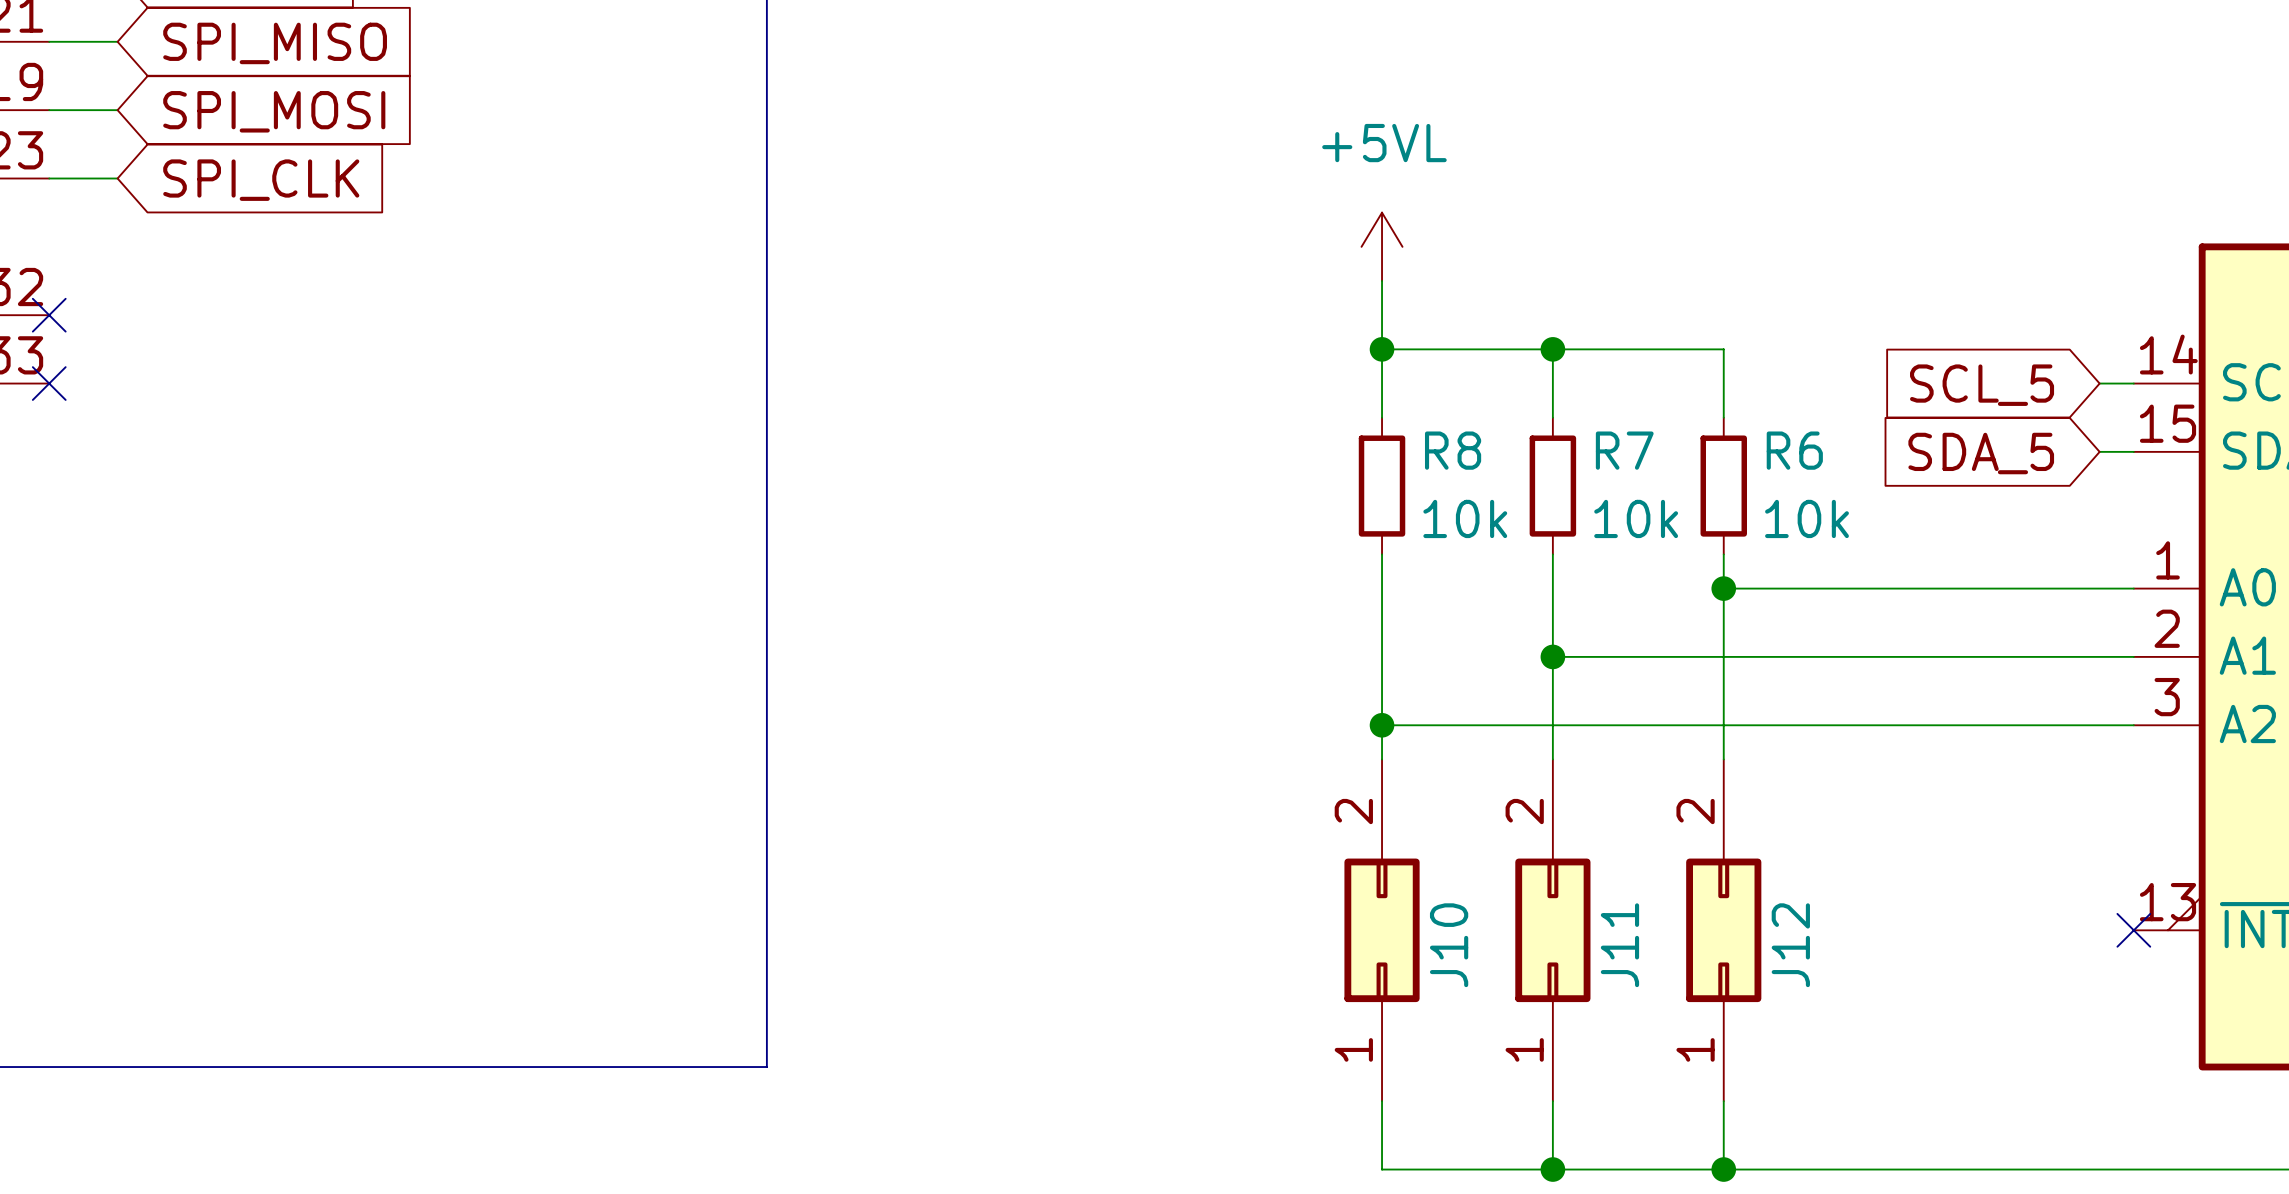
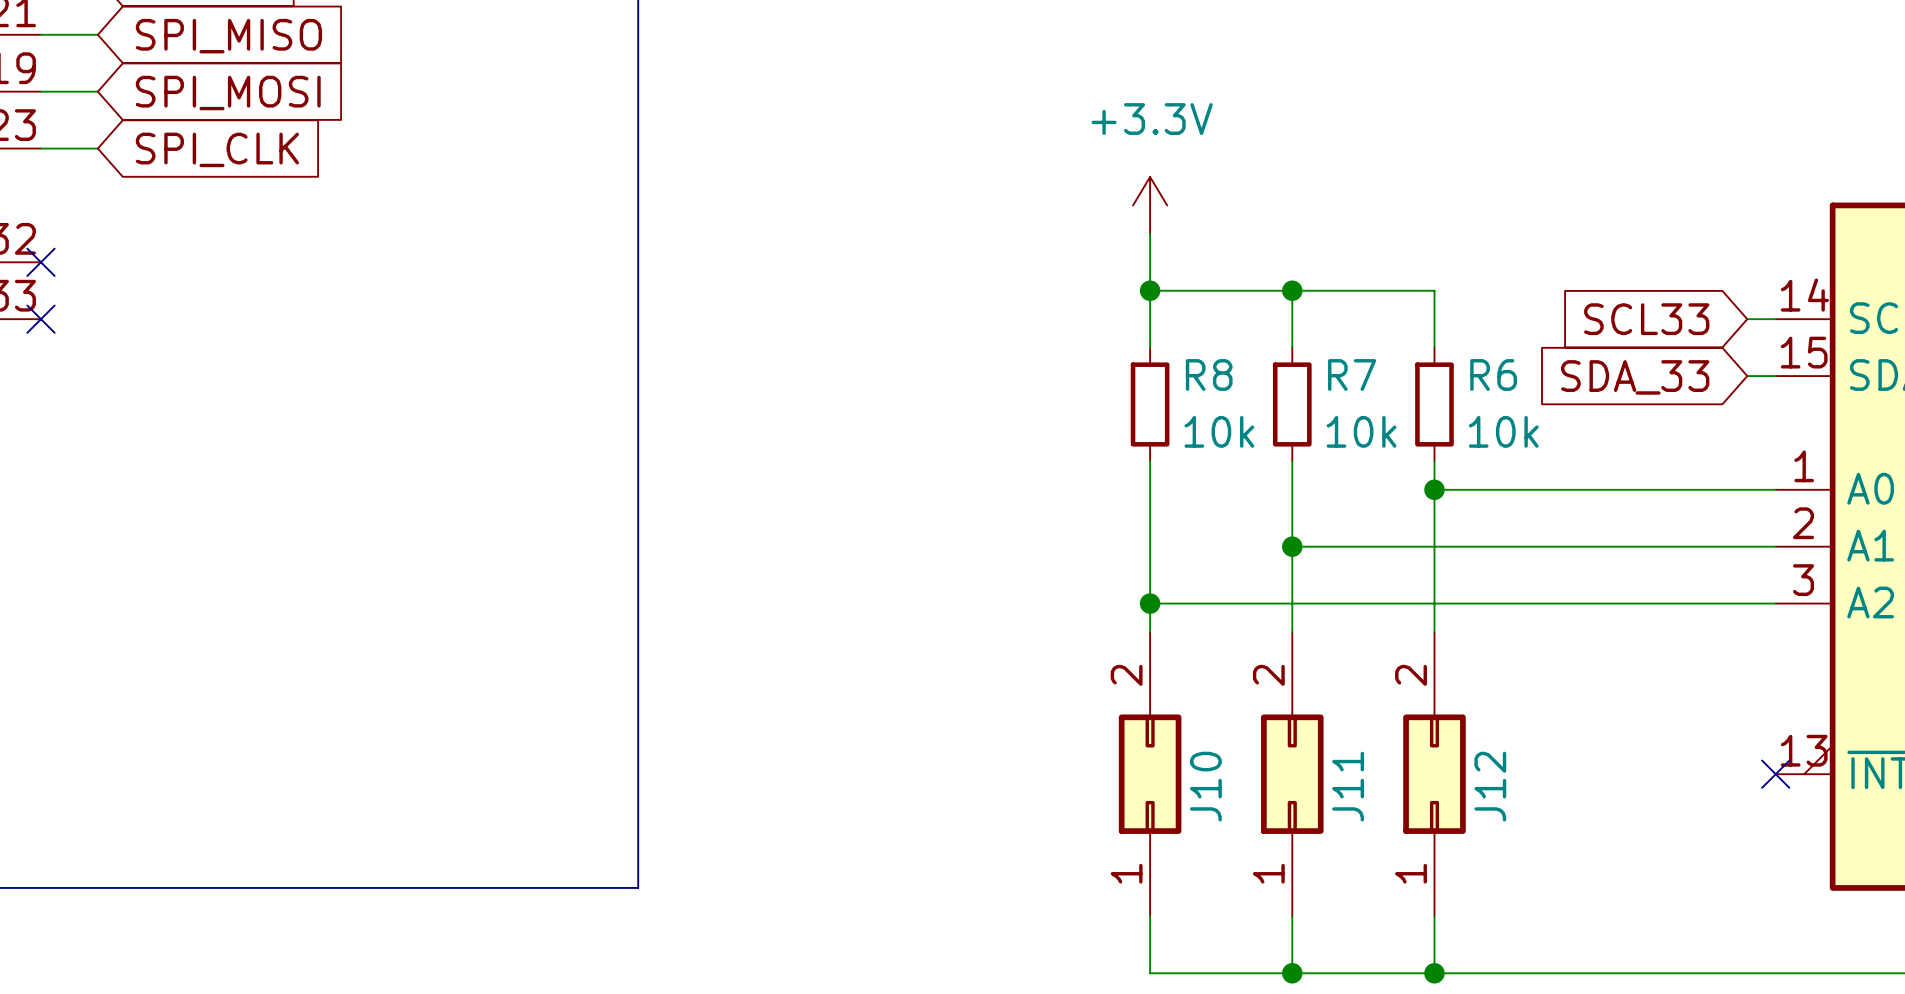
power symbol: +5VL (1382, 246) -> +3.3V (1150, 205)
global label: SCL_5 (1982, 385) -> SCL33 (1646, 319)
global label: SDA_5 (1981, 453) -> SDA_33 (1635, 377)

